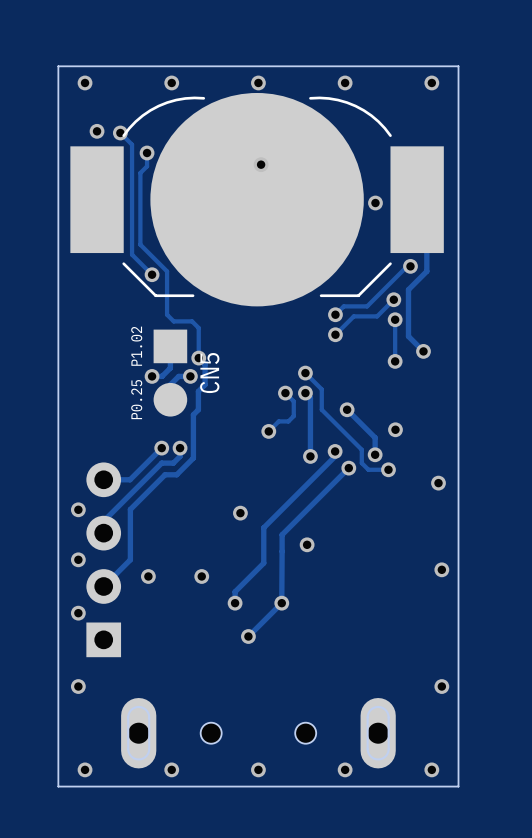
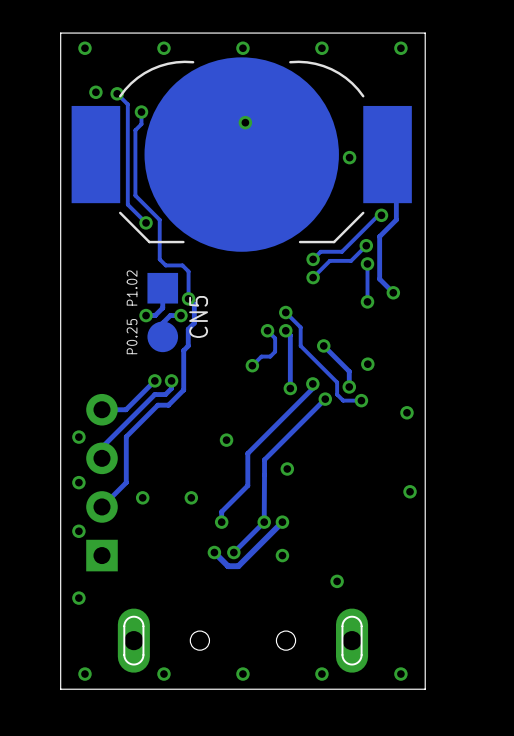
track: none -> (282, 522) (238, 566) (228, 566) (214, 552)
via: none -> (282, 522)
via: none -> (214, 552)
via: none -> (282, 555)
via: none -> (337, 581)
via: (441, 686) -> none

